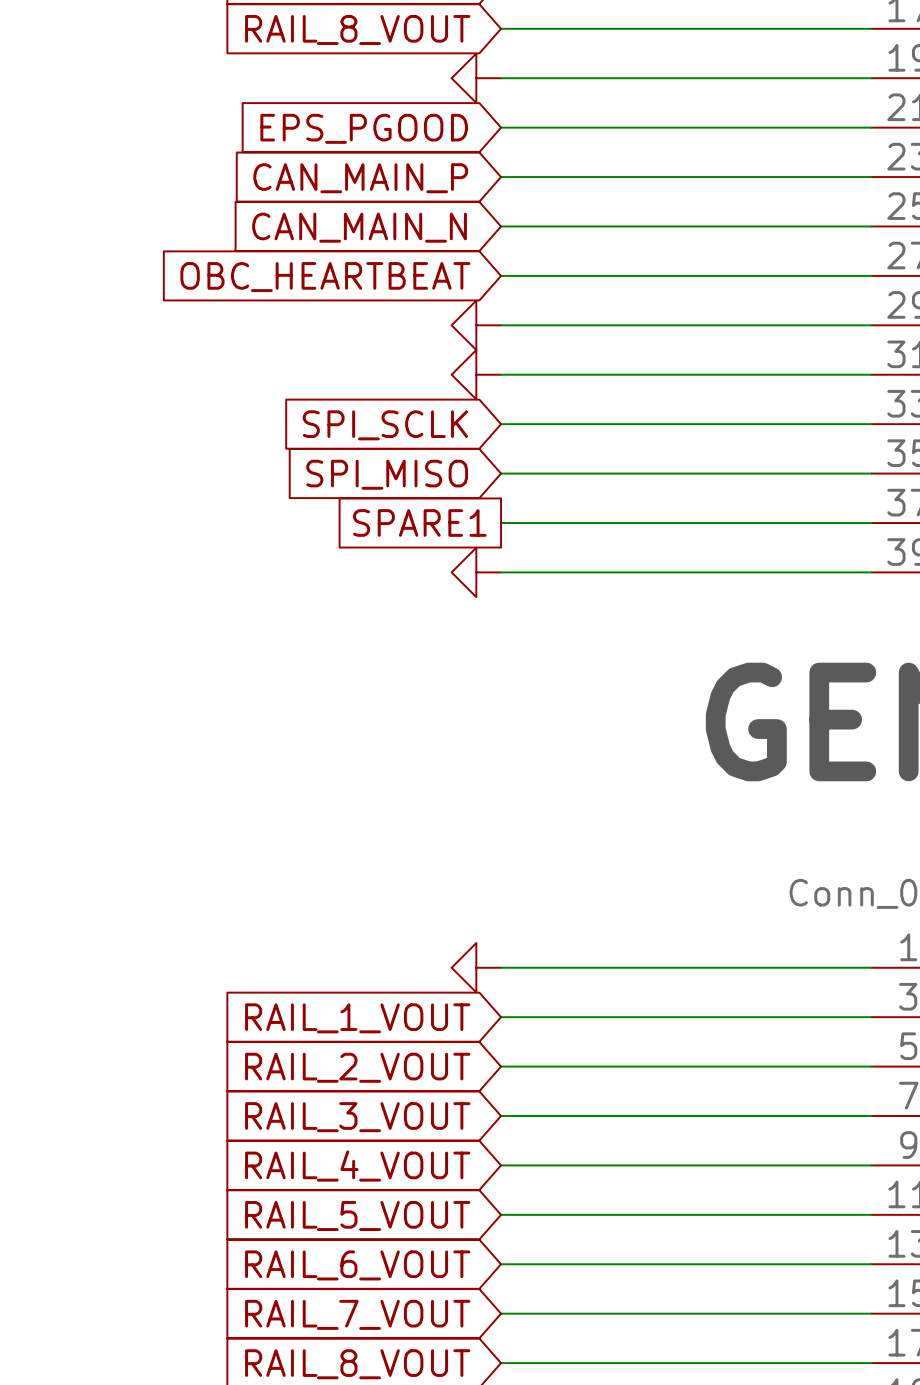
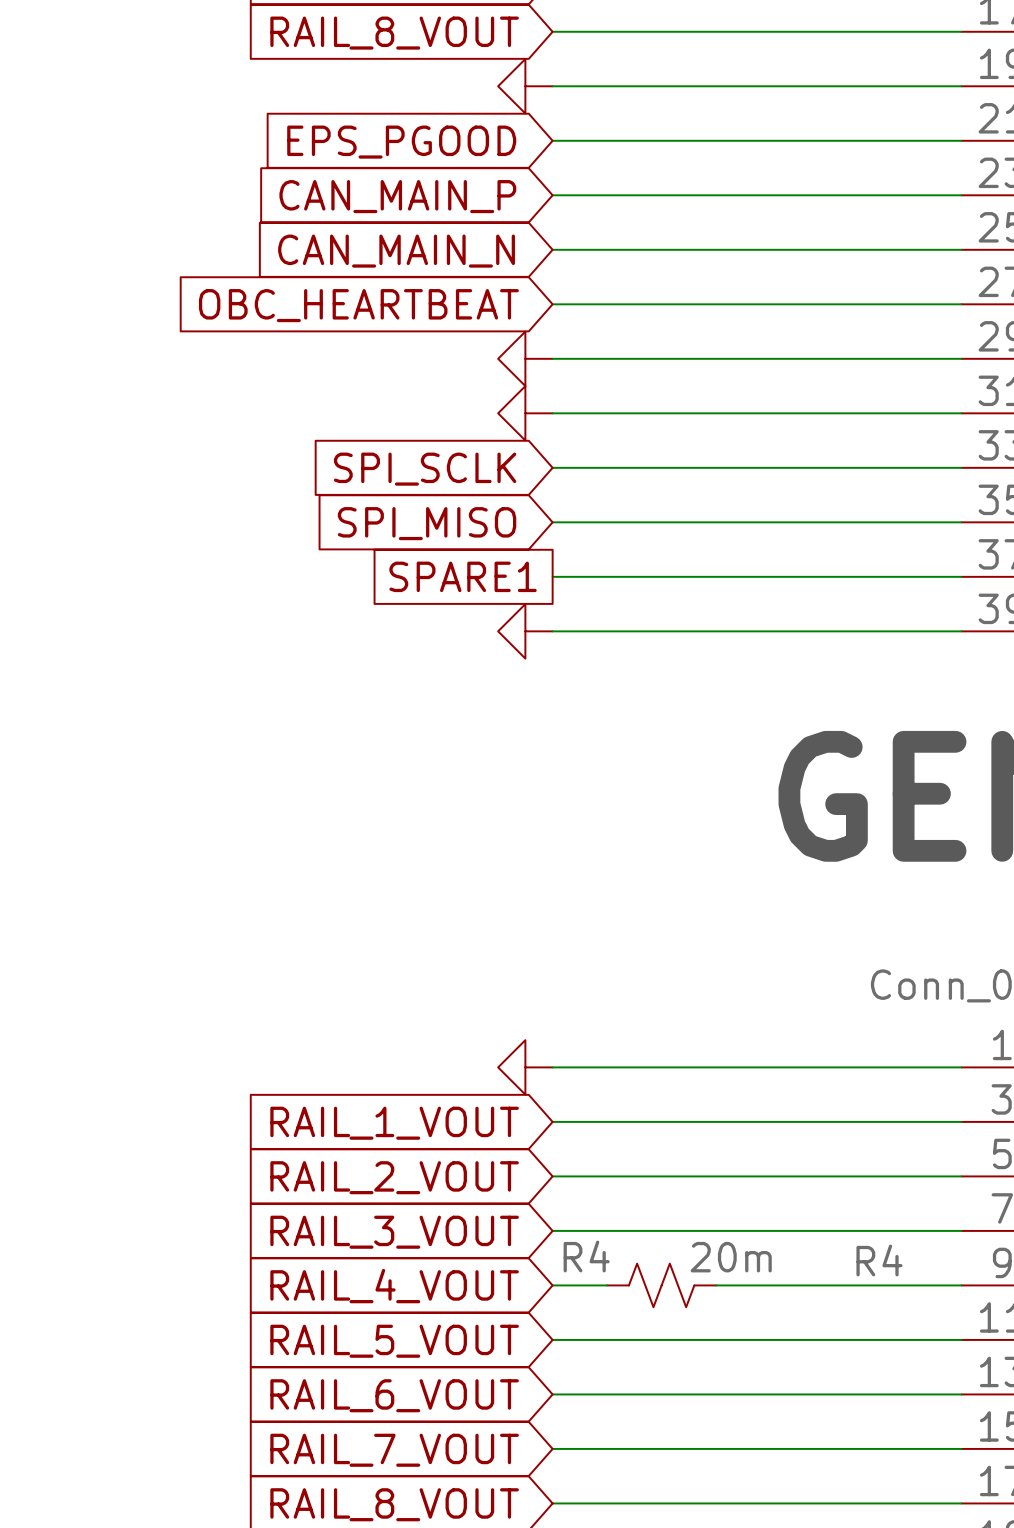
label: none -> R4 (879, 1260)
wire: (550, 1165) (649, 1165) -> none
R4: none -> 20m (661, 1285)

